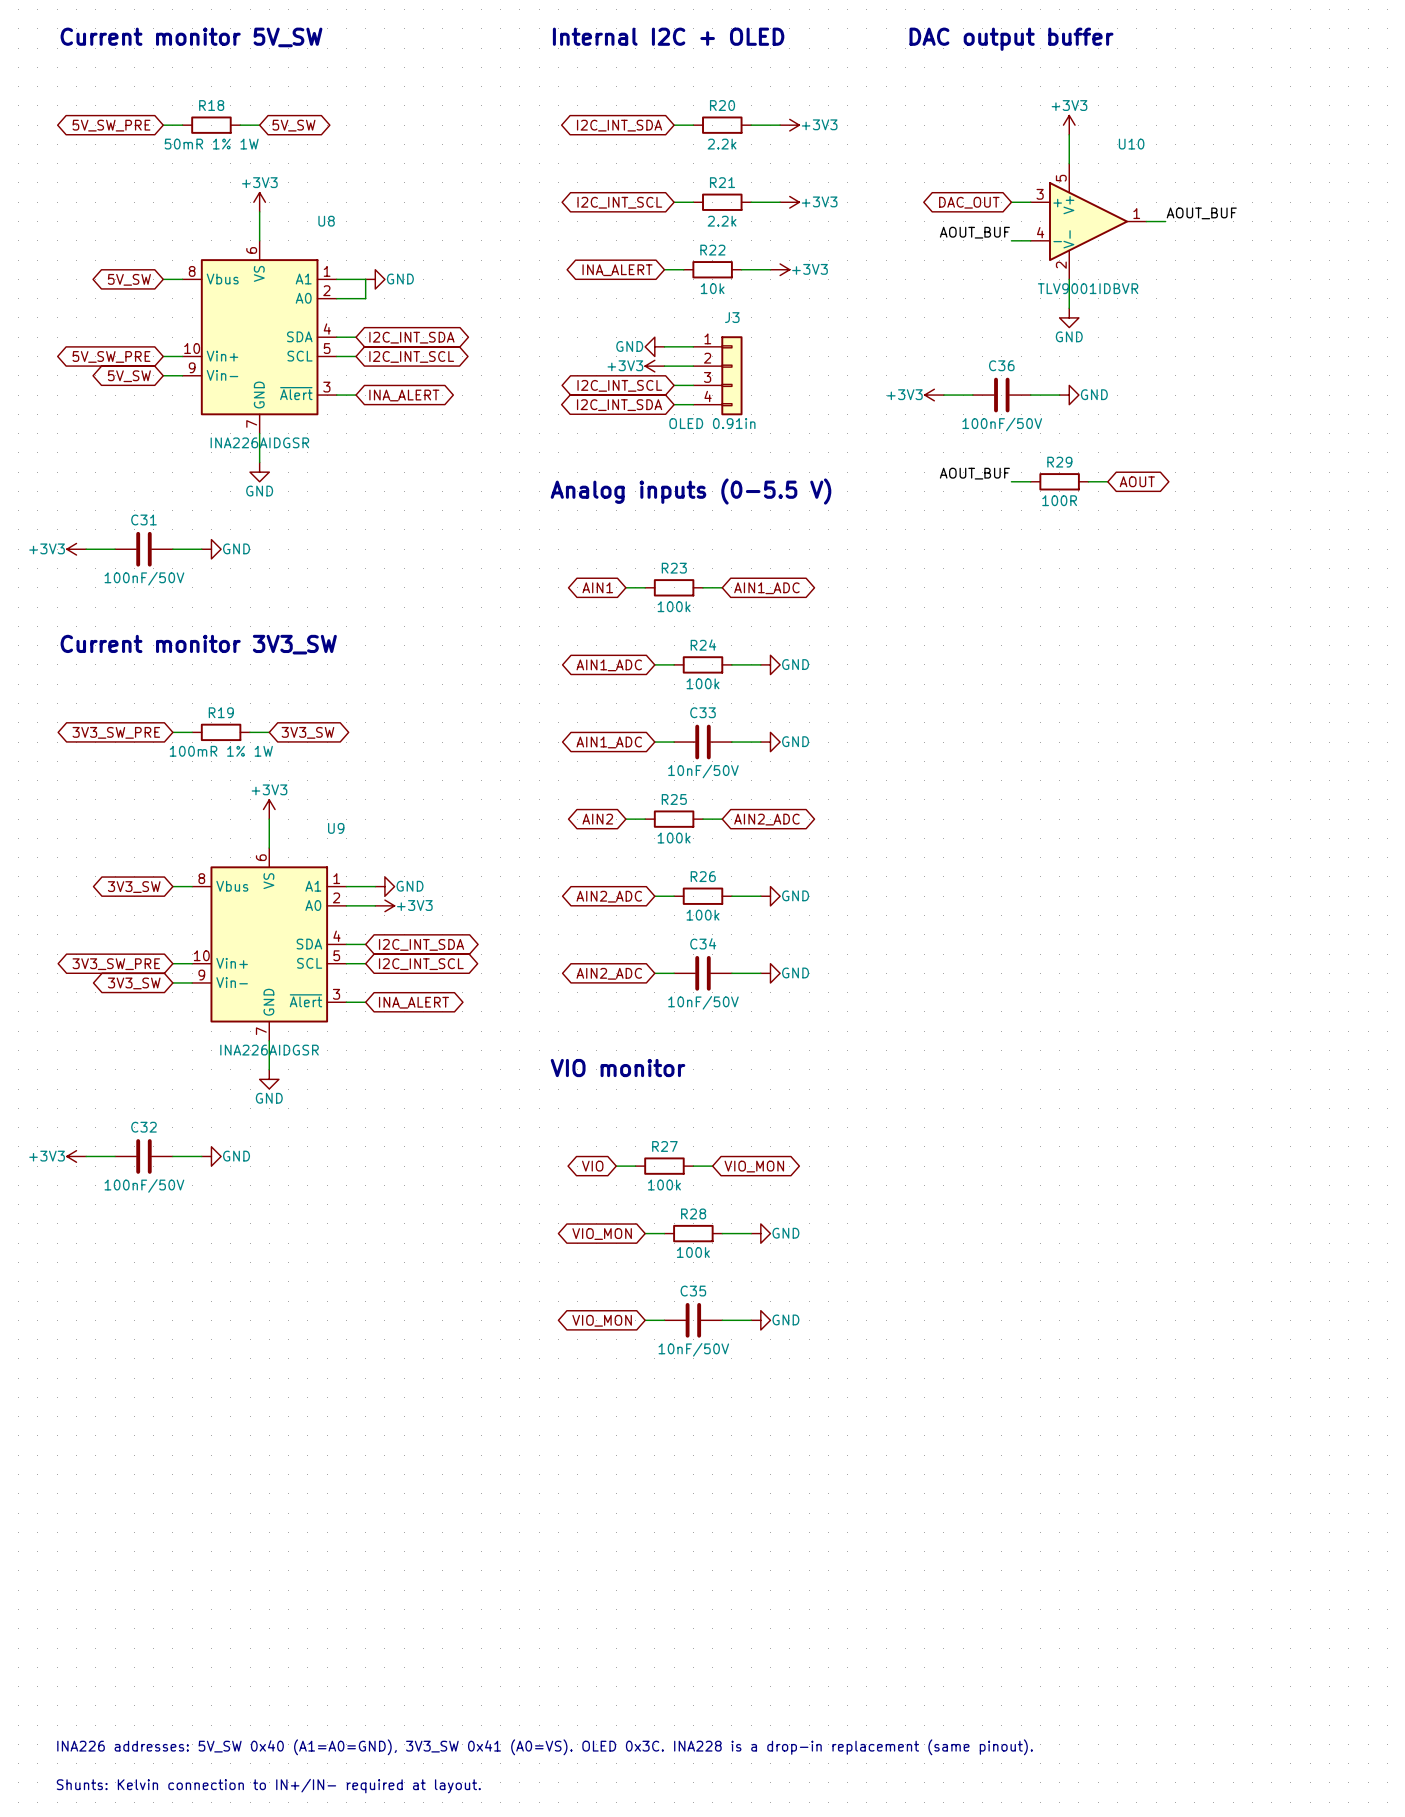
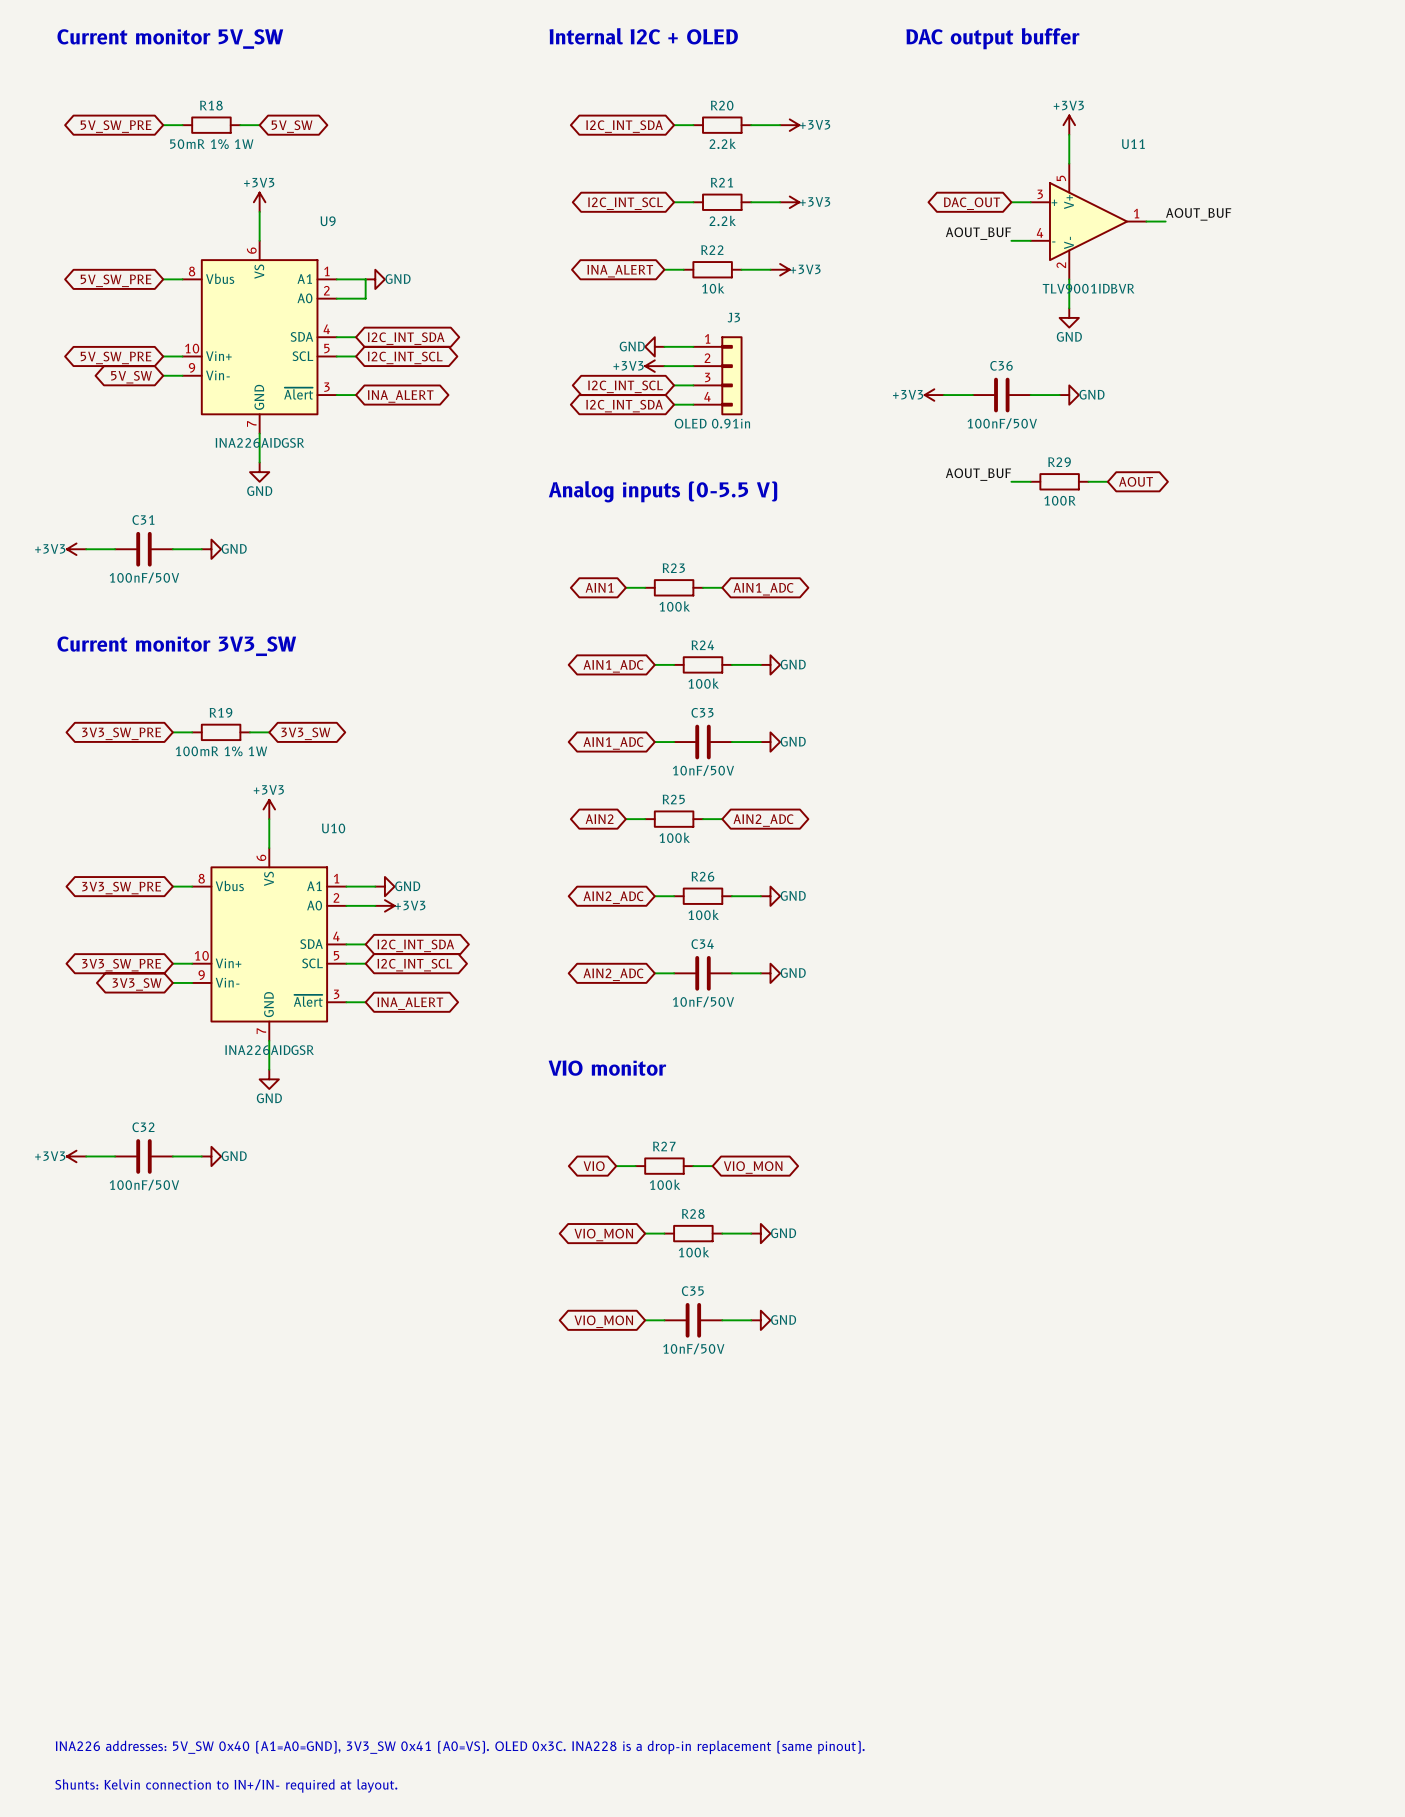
U10 name: U10 (1131, 144) -> U11 (1133, 144)
U8 name: U8 (326, 221) -> U9 (328, 221)
global label: 5V_SW (129, 279) -> 5V_SW_PRE (116, 280)
U9 name: U9 (336, 828) -> U10 (333, 828)
global label: 3V3_SW (134, 887) -> 3V3_SW_PRE (121, 888)

